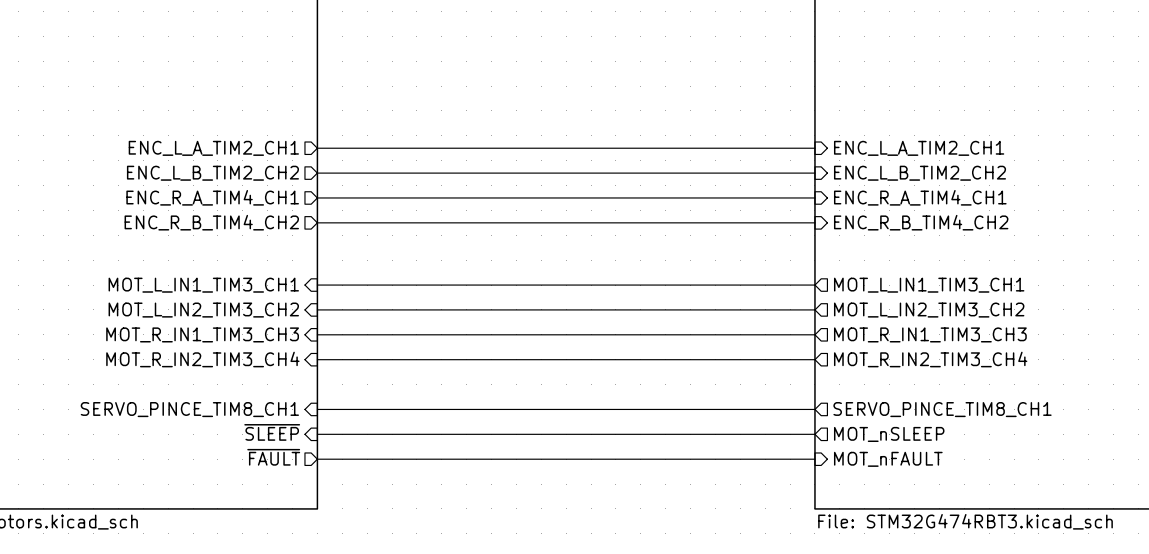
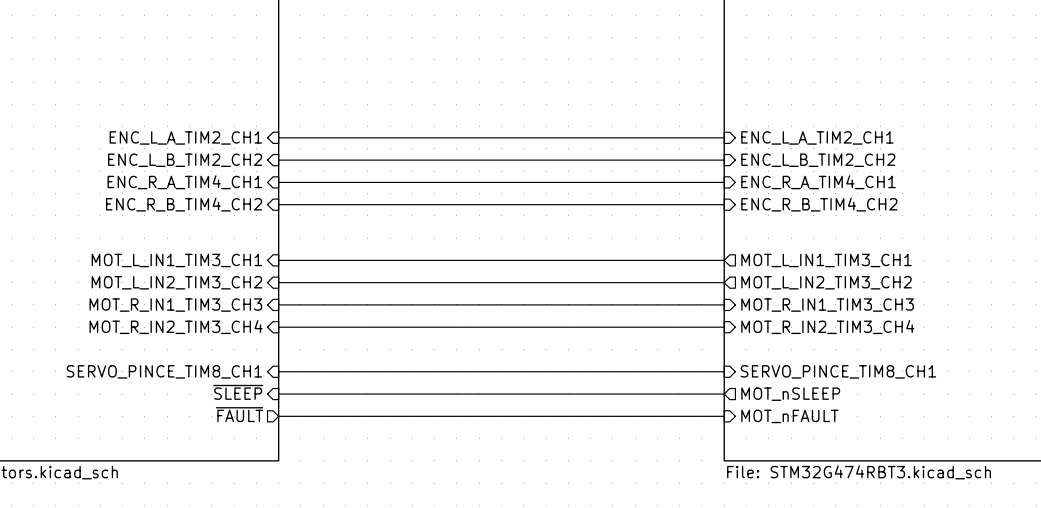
sheet pin shape: output (213, 148) -> input (185, 137)
sheet pin shape: output (212, 173) -> input (185, 160)
sheet pin shape: output (212, 197) -> input (184, 182)
sheet pin shape: output (211, 222) -> input (184, 204)
sheet pin shape: output (930, 334) -> input (827, 305)
sheet pin shape: output (930, 359) -> input (827, 327)
sheet pin shape: output (942, 409) -> input (838, 371)

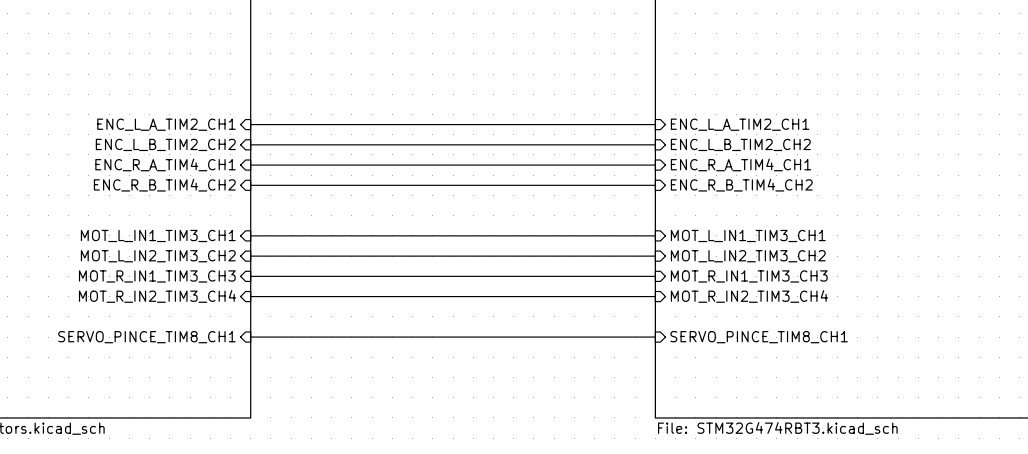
sheet pin shape: output (826, 260) -> input (748, 235)
sheet pin shape: output (826, 282) -> input (748, 256)
sheet pin: ~{SLEEP} (238, 392) -> none
wire: (278, 394) (724, 394) -> none
sheet pin: MOT_nSLEEP (790, 394) -> none
sheet pin: ~{FAULT} (239, 414) -> none
wire: (278, 416) (724, 416) -> none
sheet pin: MOT_nFAULT (789, 416) -> none

